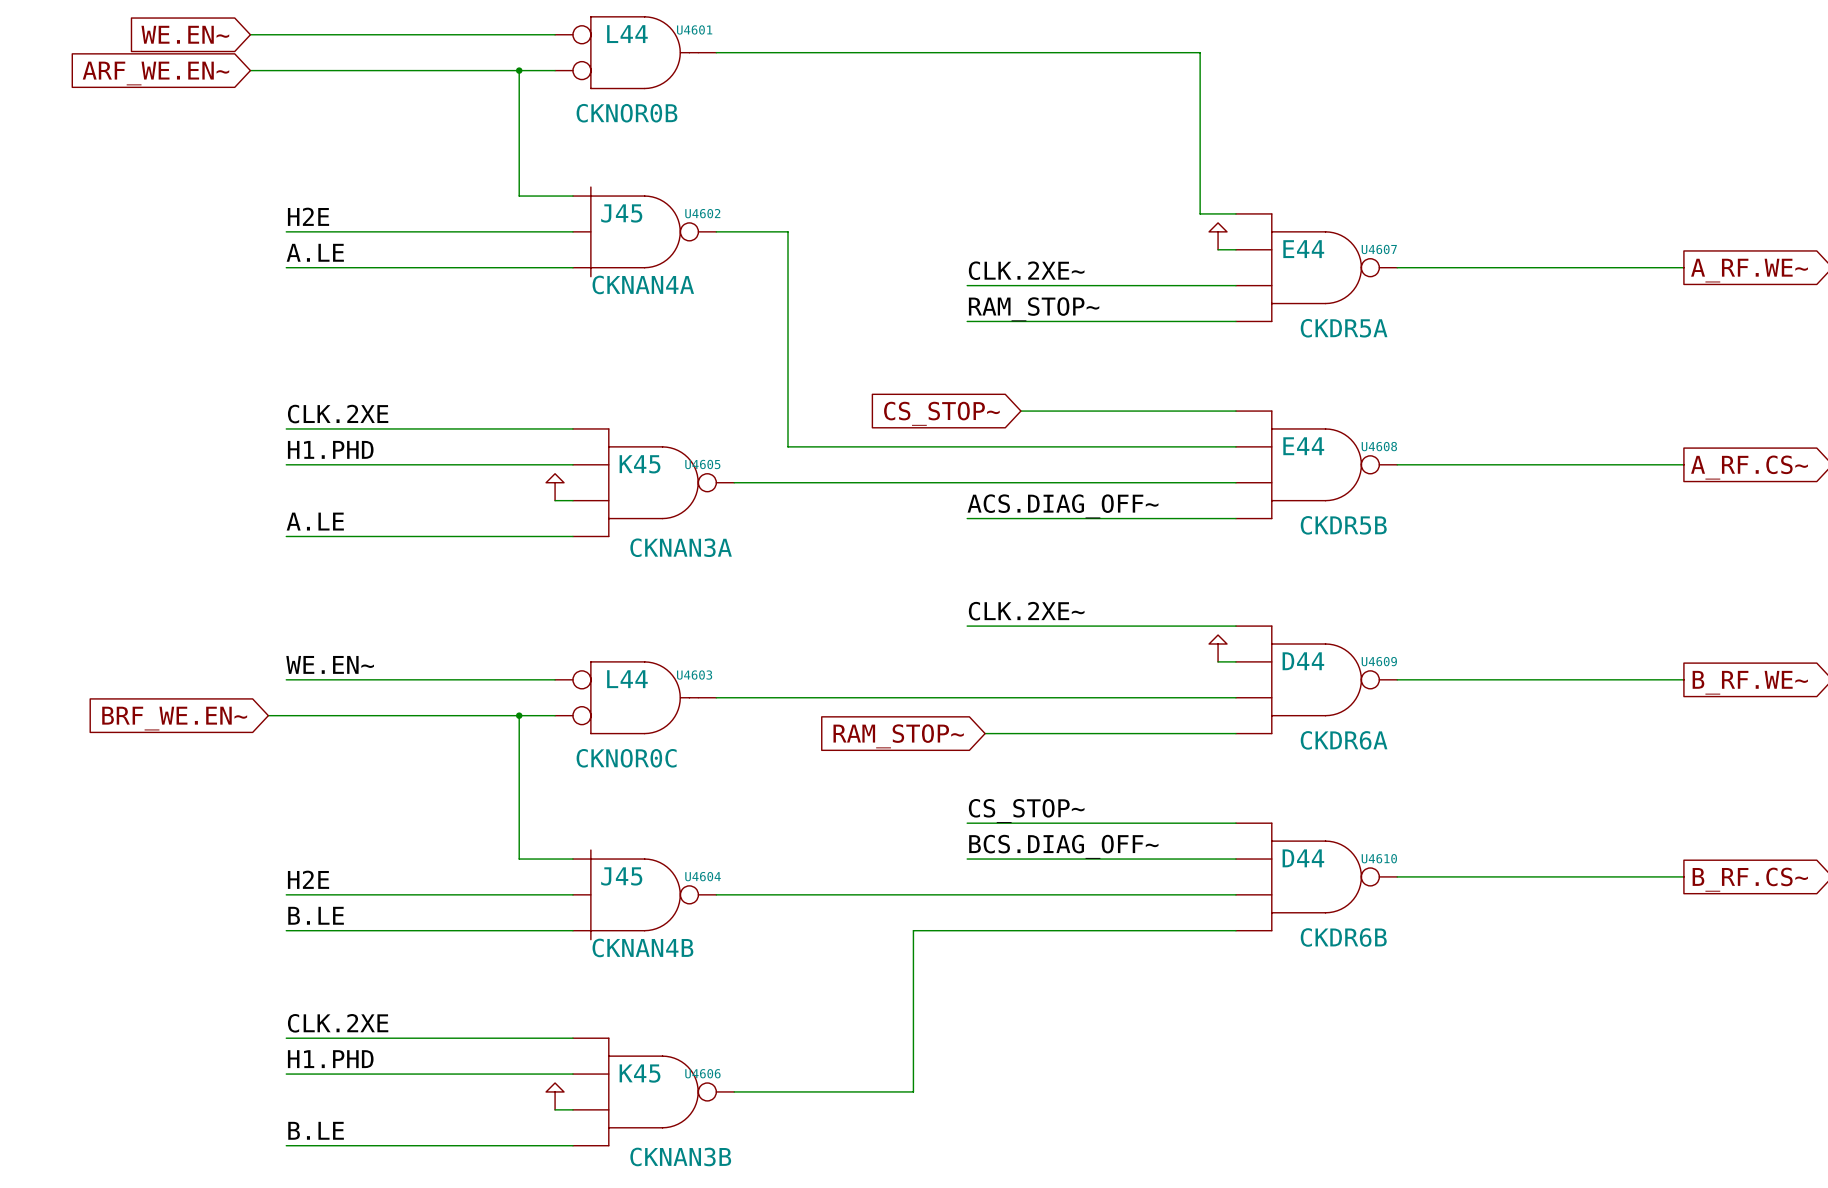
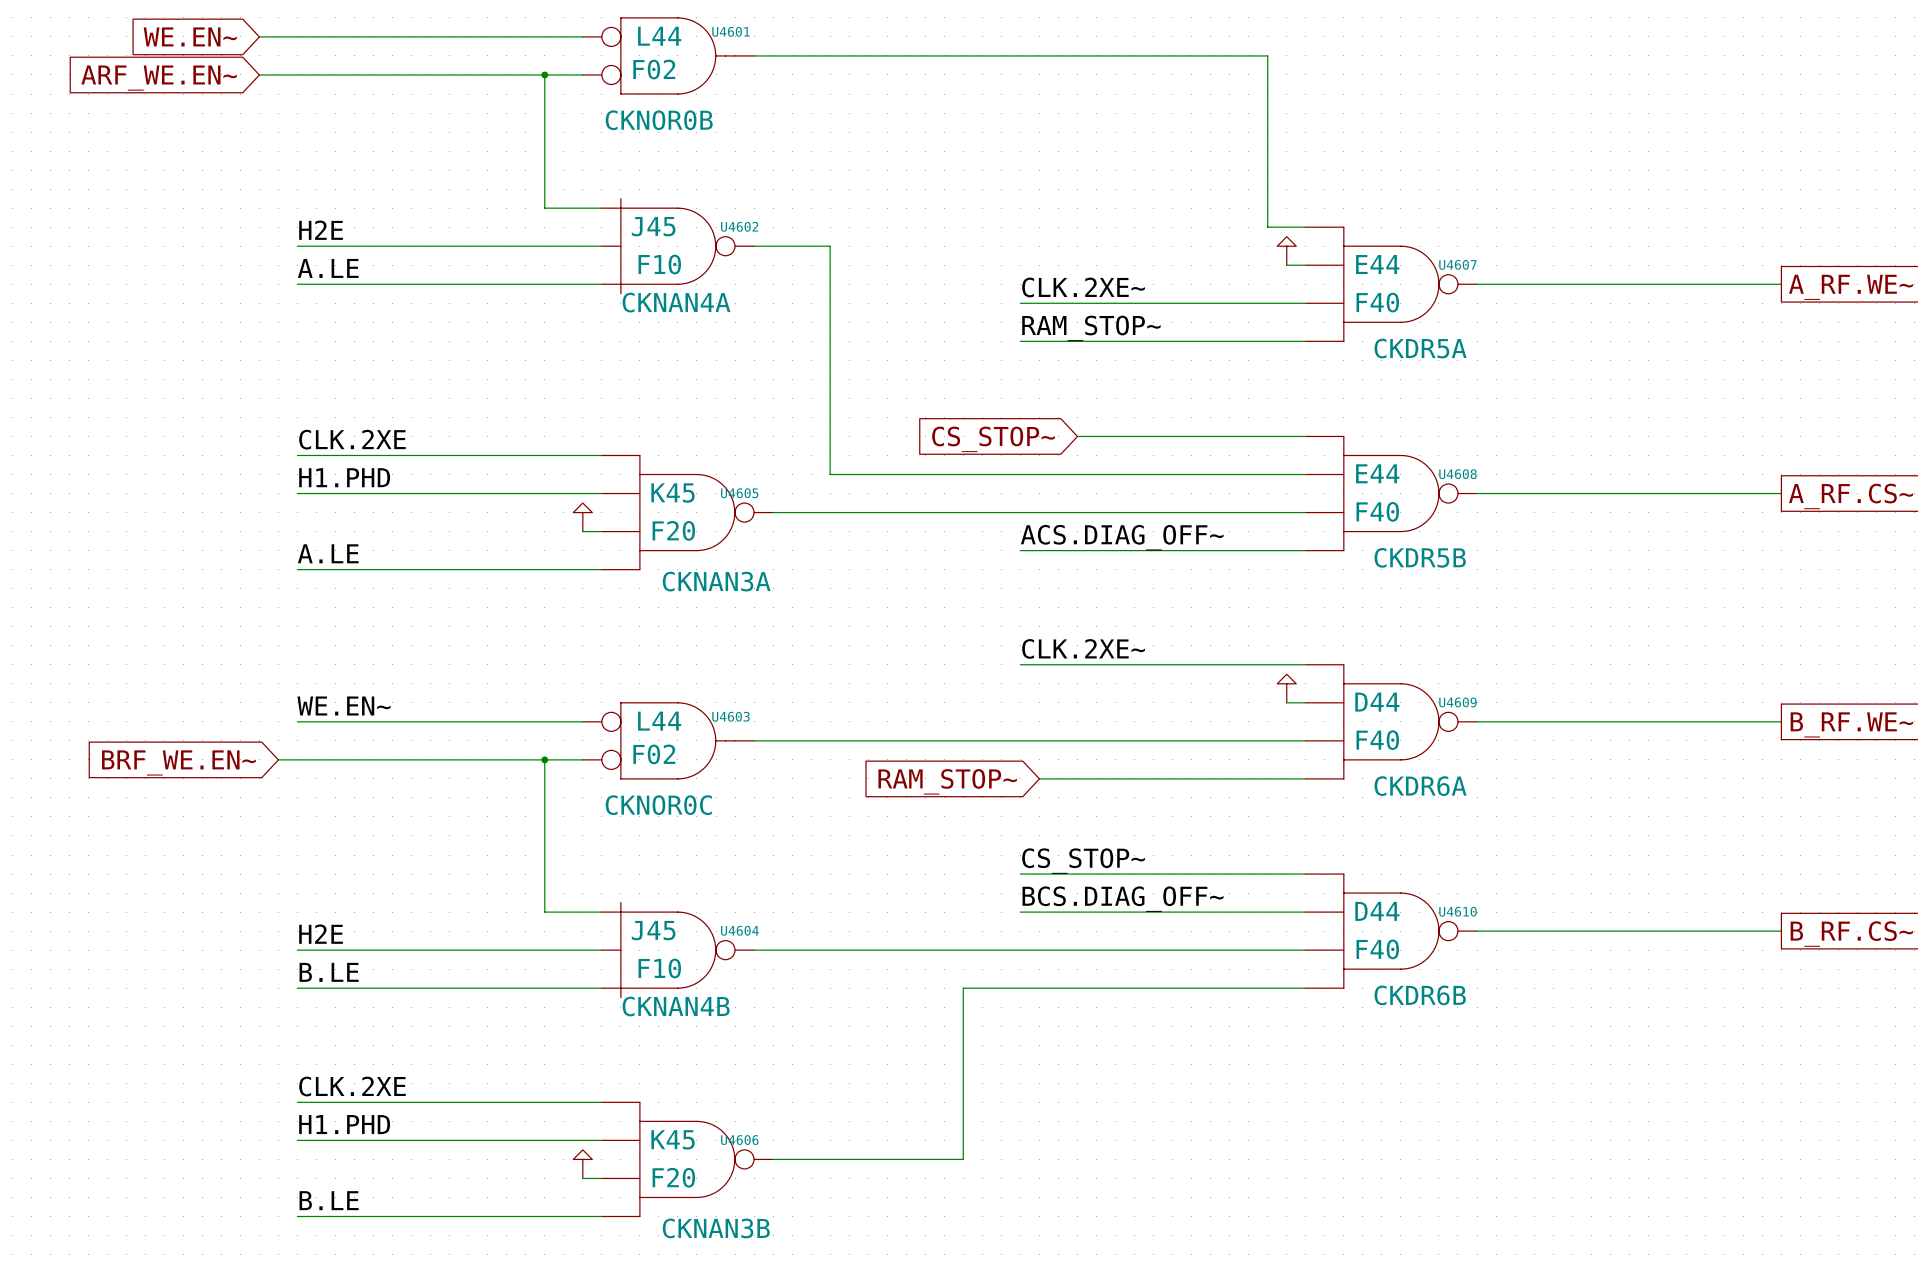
U4601 value: none -> F02 (654, 69)
U4602 value: none -> F10 (659, 264)
U4607 value: none -> F40 (1377, 302)
U4608 value: none -> F40 (1377, 511)
U4605 value: none -> F20 (673, 530)
U4609 value: none -> F40 (1377, 740)
U4603 value: none -> F02 (654, 754)
U4610 value: none -> F40 (1377, 949)
U4604 value: none -> F10 (659, 968)
U4606 value: none -> F20 (673, 1177)

